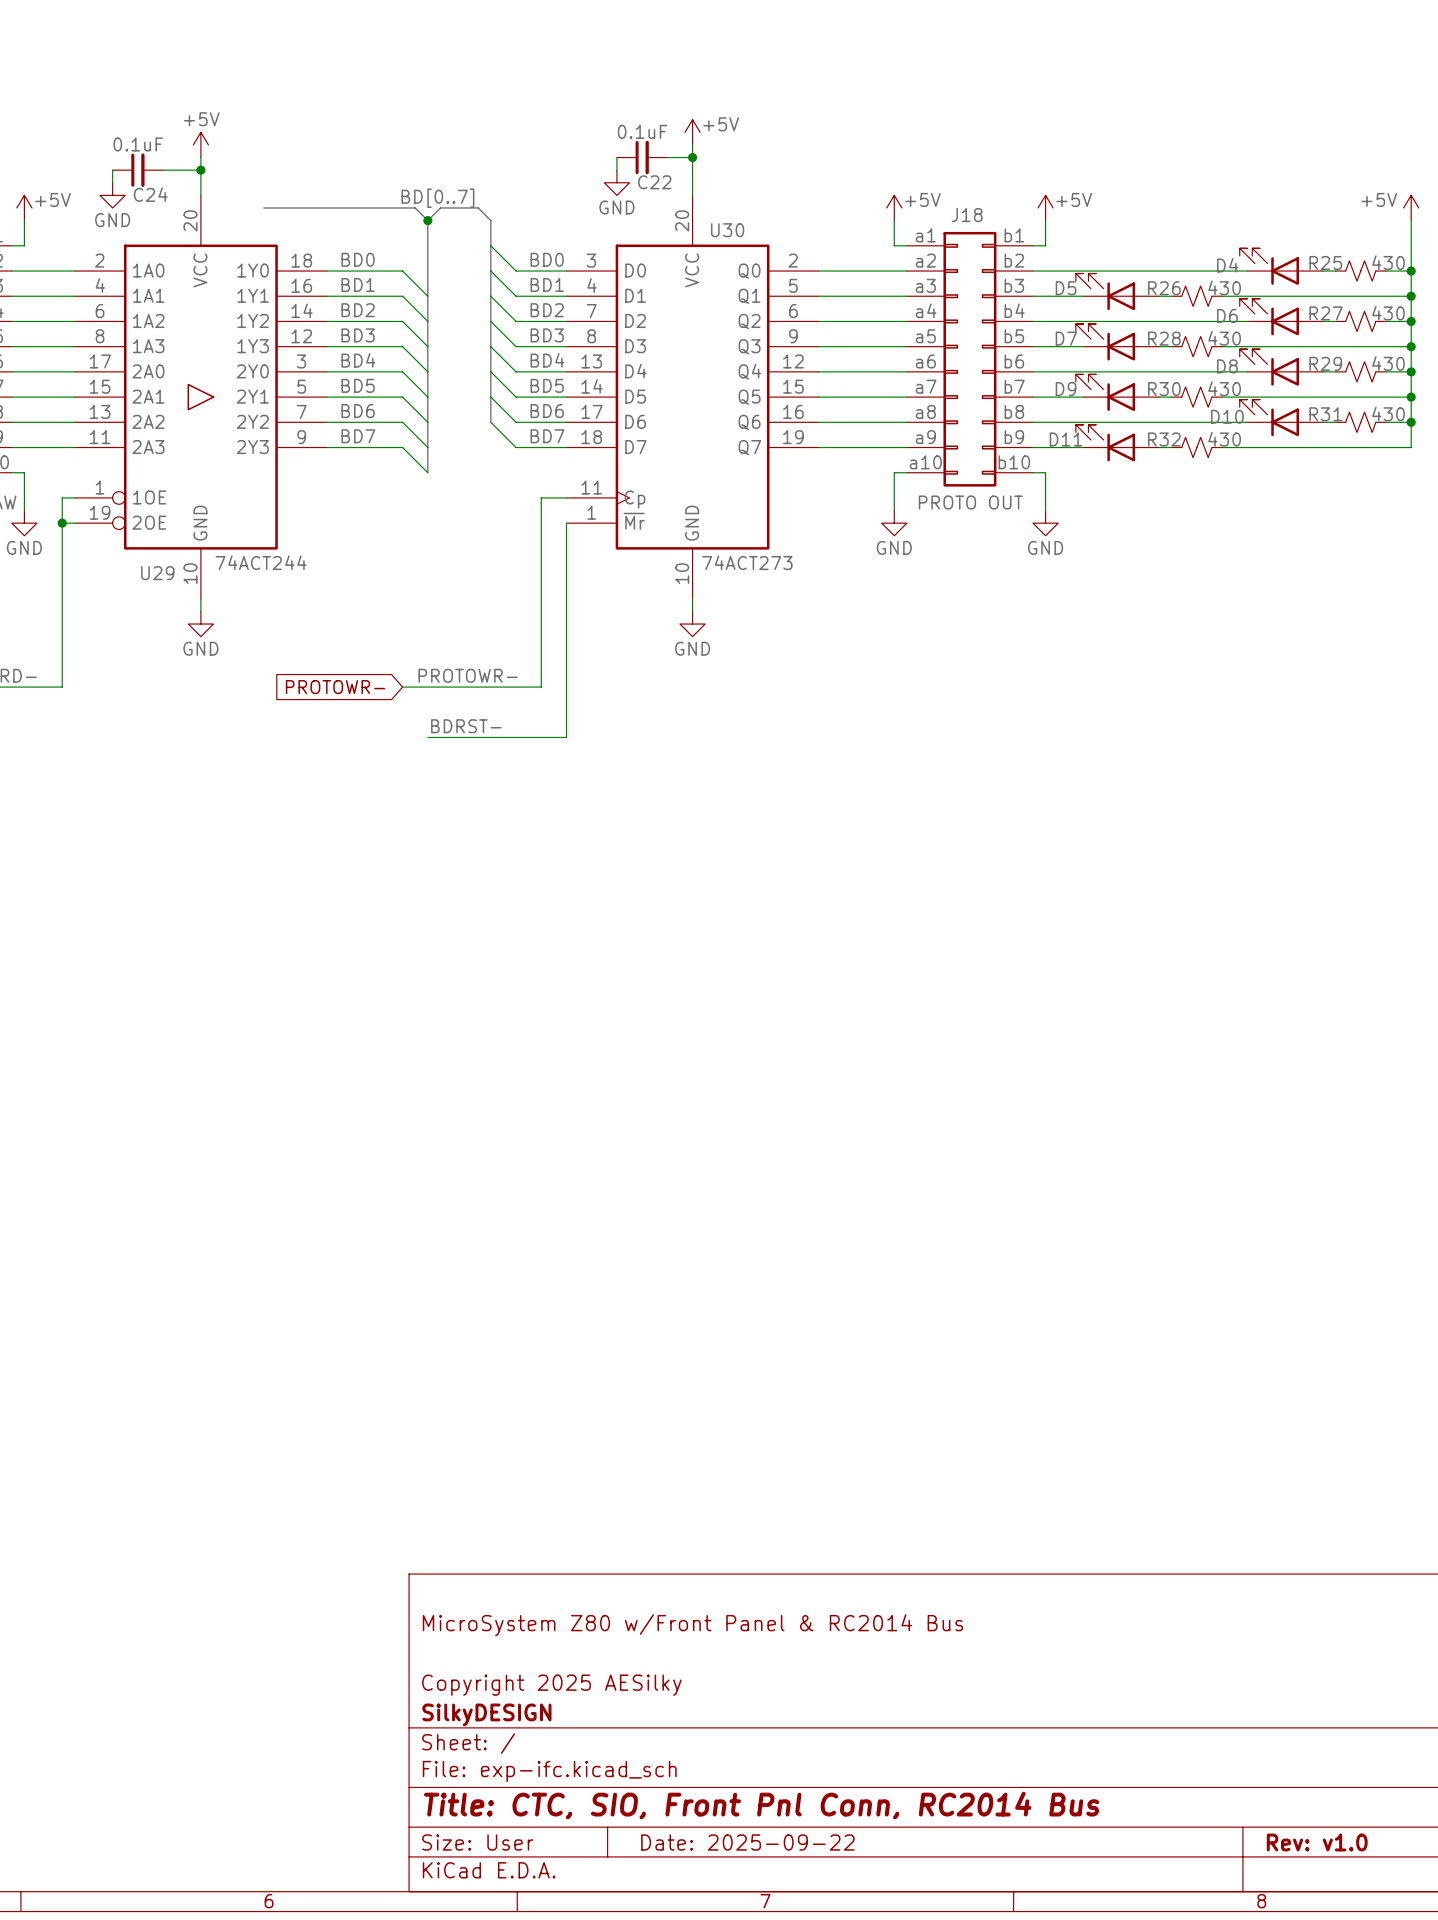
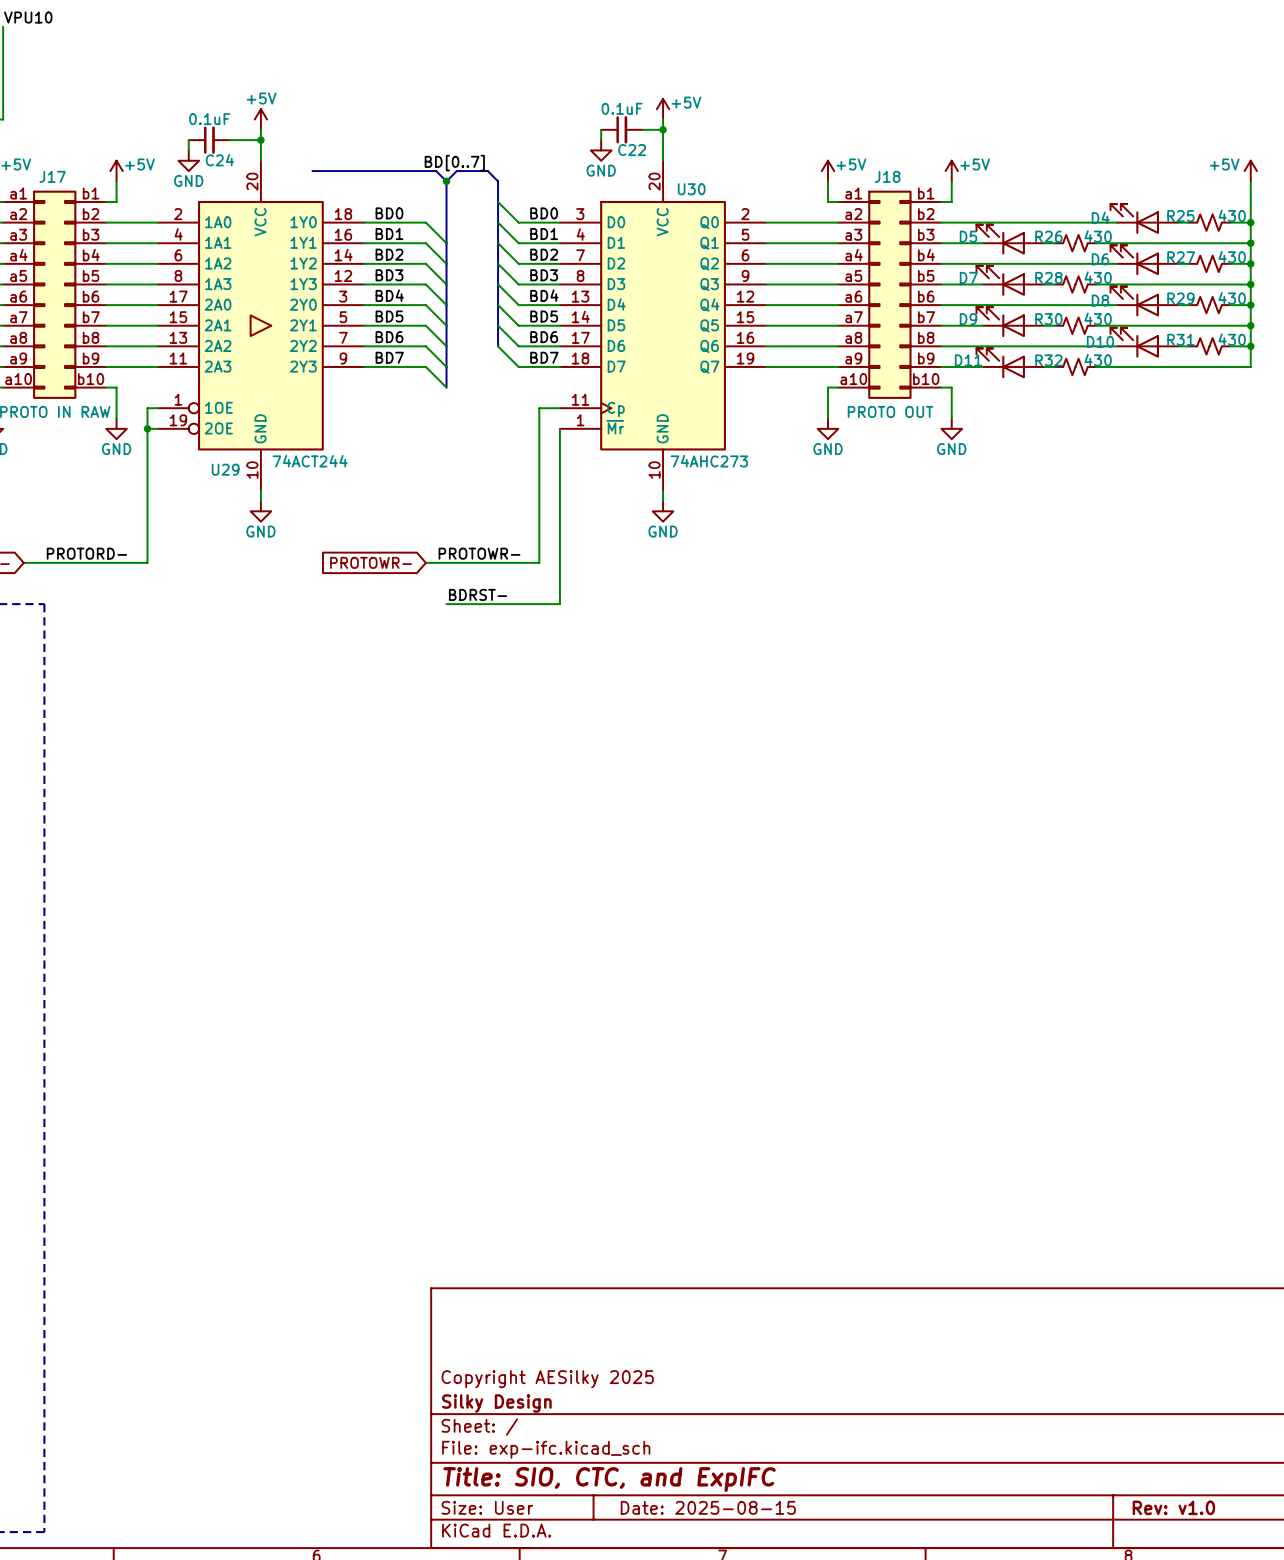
U30 value: 74ACT273 (747, 562) -> 74AHC273 (709, 461)
title block: MicroSystem Z80 w/Front Panel & RC2014 Bus (692, 1625) -> none
title block: Copyright 2025 AESilky (551, 1685) -> Copyright AESilky 2025 (547, 1379)
title block: SilkyDESIGN (486, 1714) -> Silky Design (496, 1403)
title block: Title: CTC, SIO, Front Pnl Conn, RC2014 Bus (761, 1805) -> Title: SIO, CTC, and ExpIFC (609, 1479)
title block: Date: 2025-09-22 (747, 1842) -> Date: 2025-08-15 (708, 1507)

